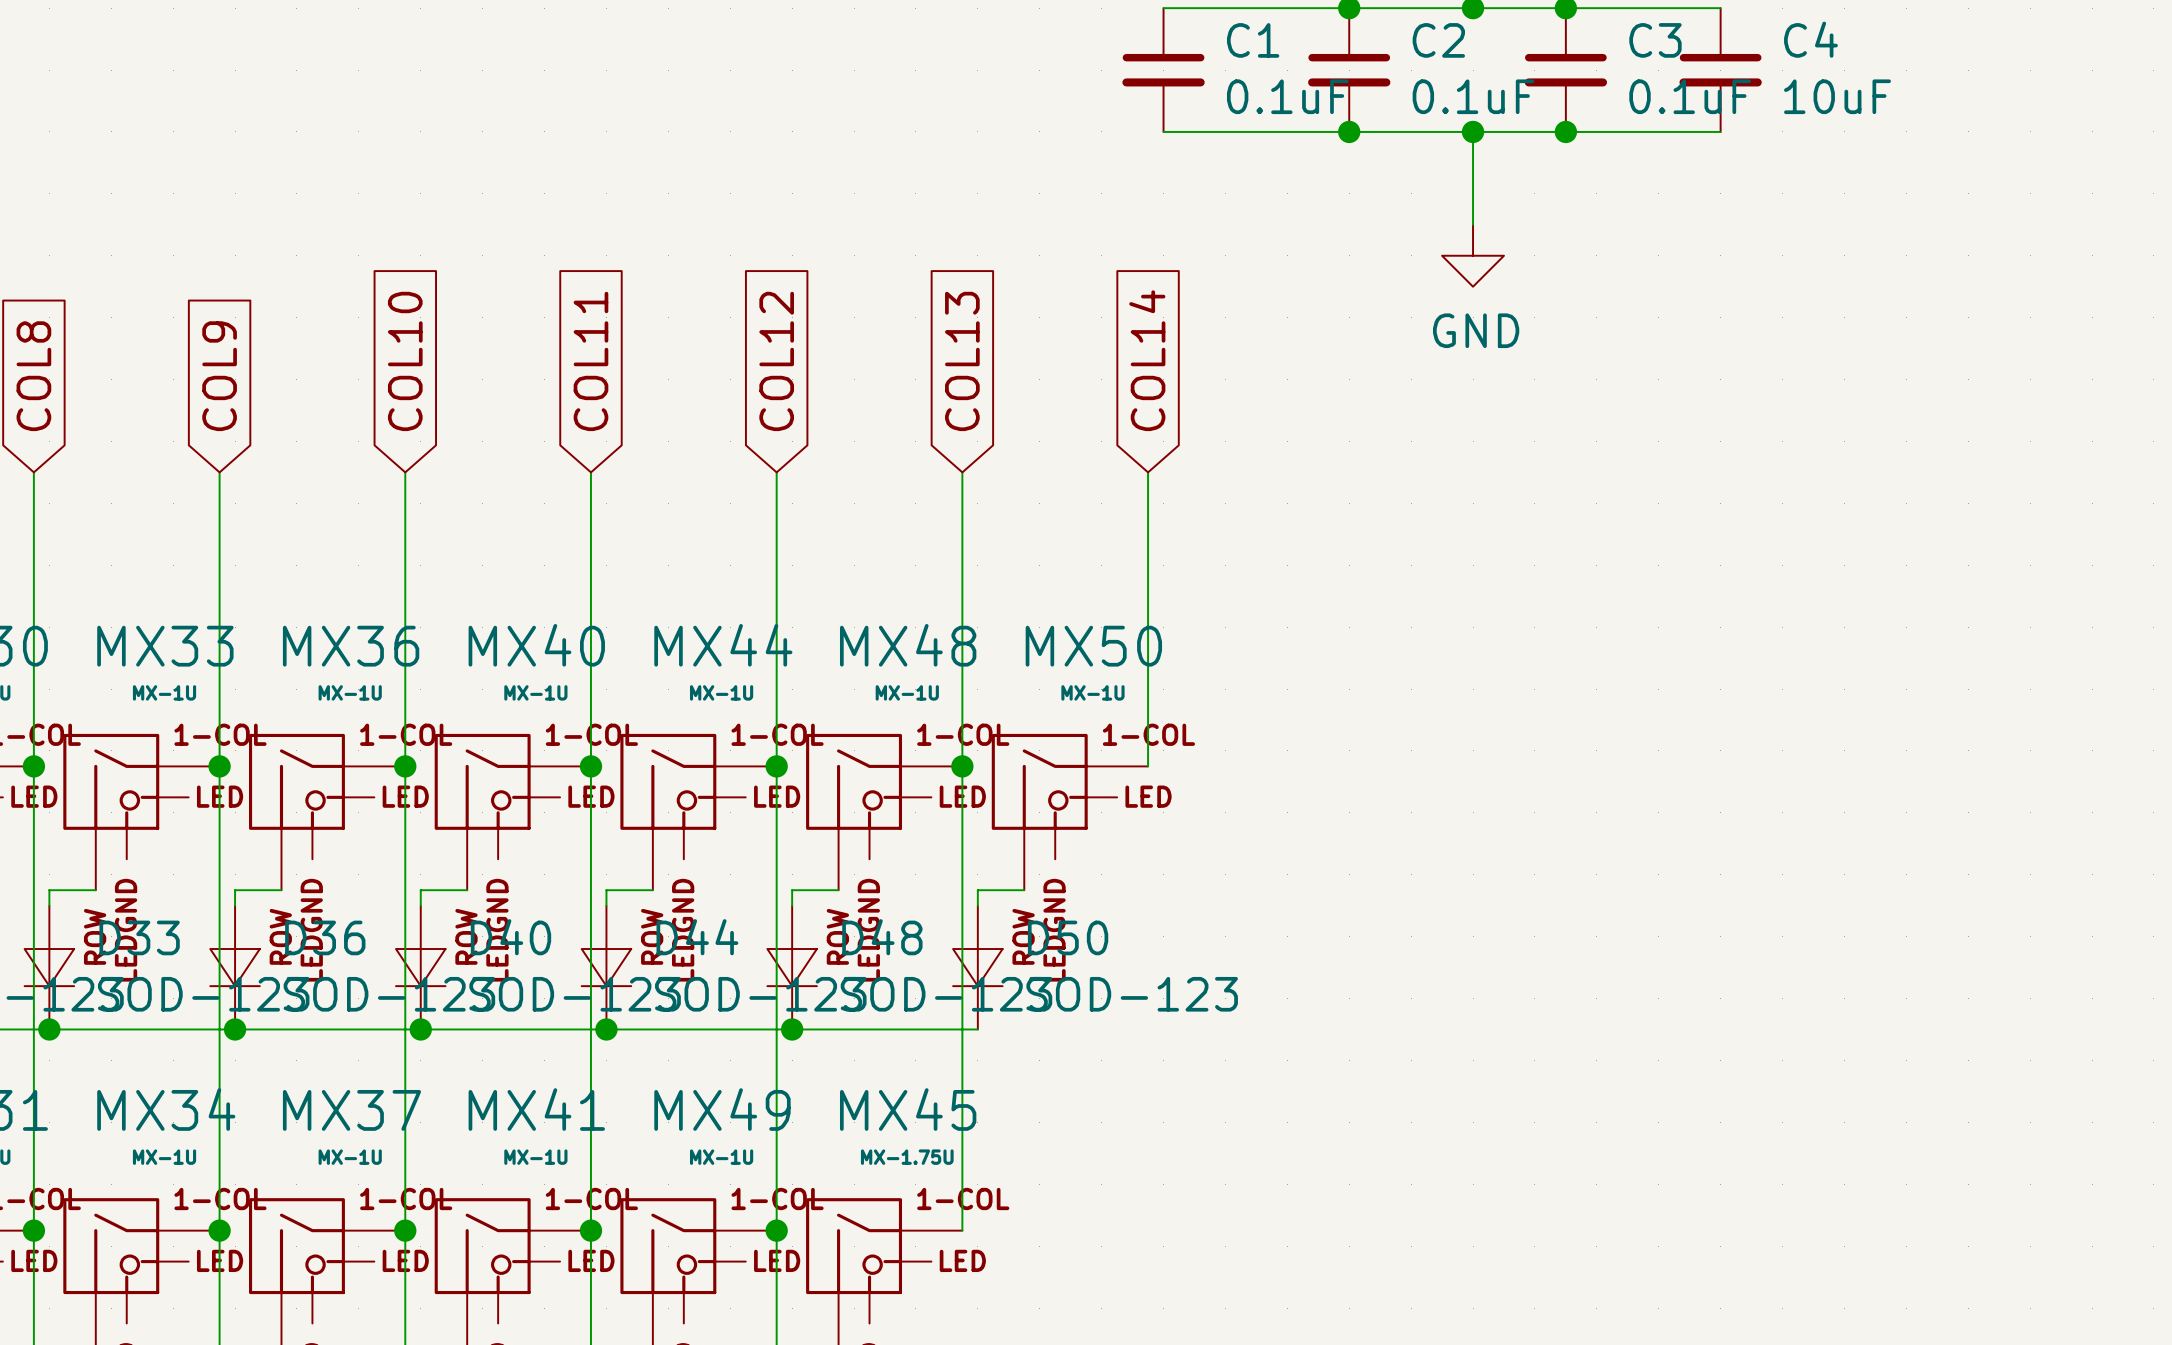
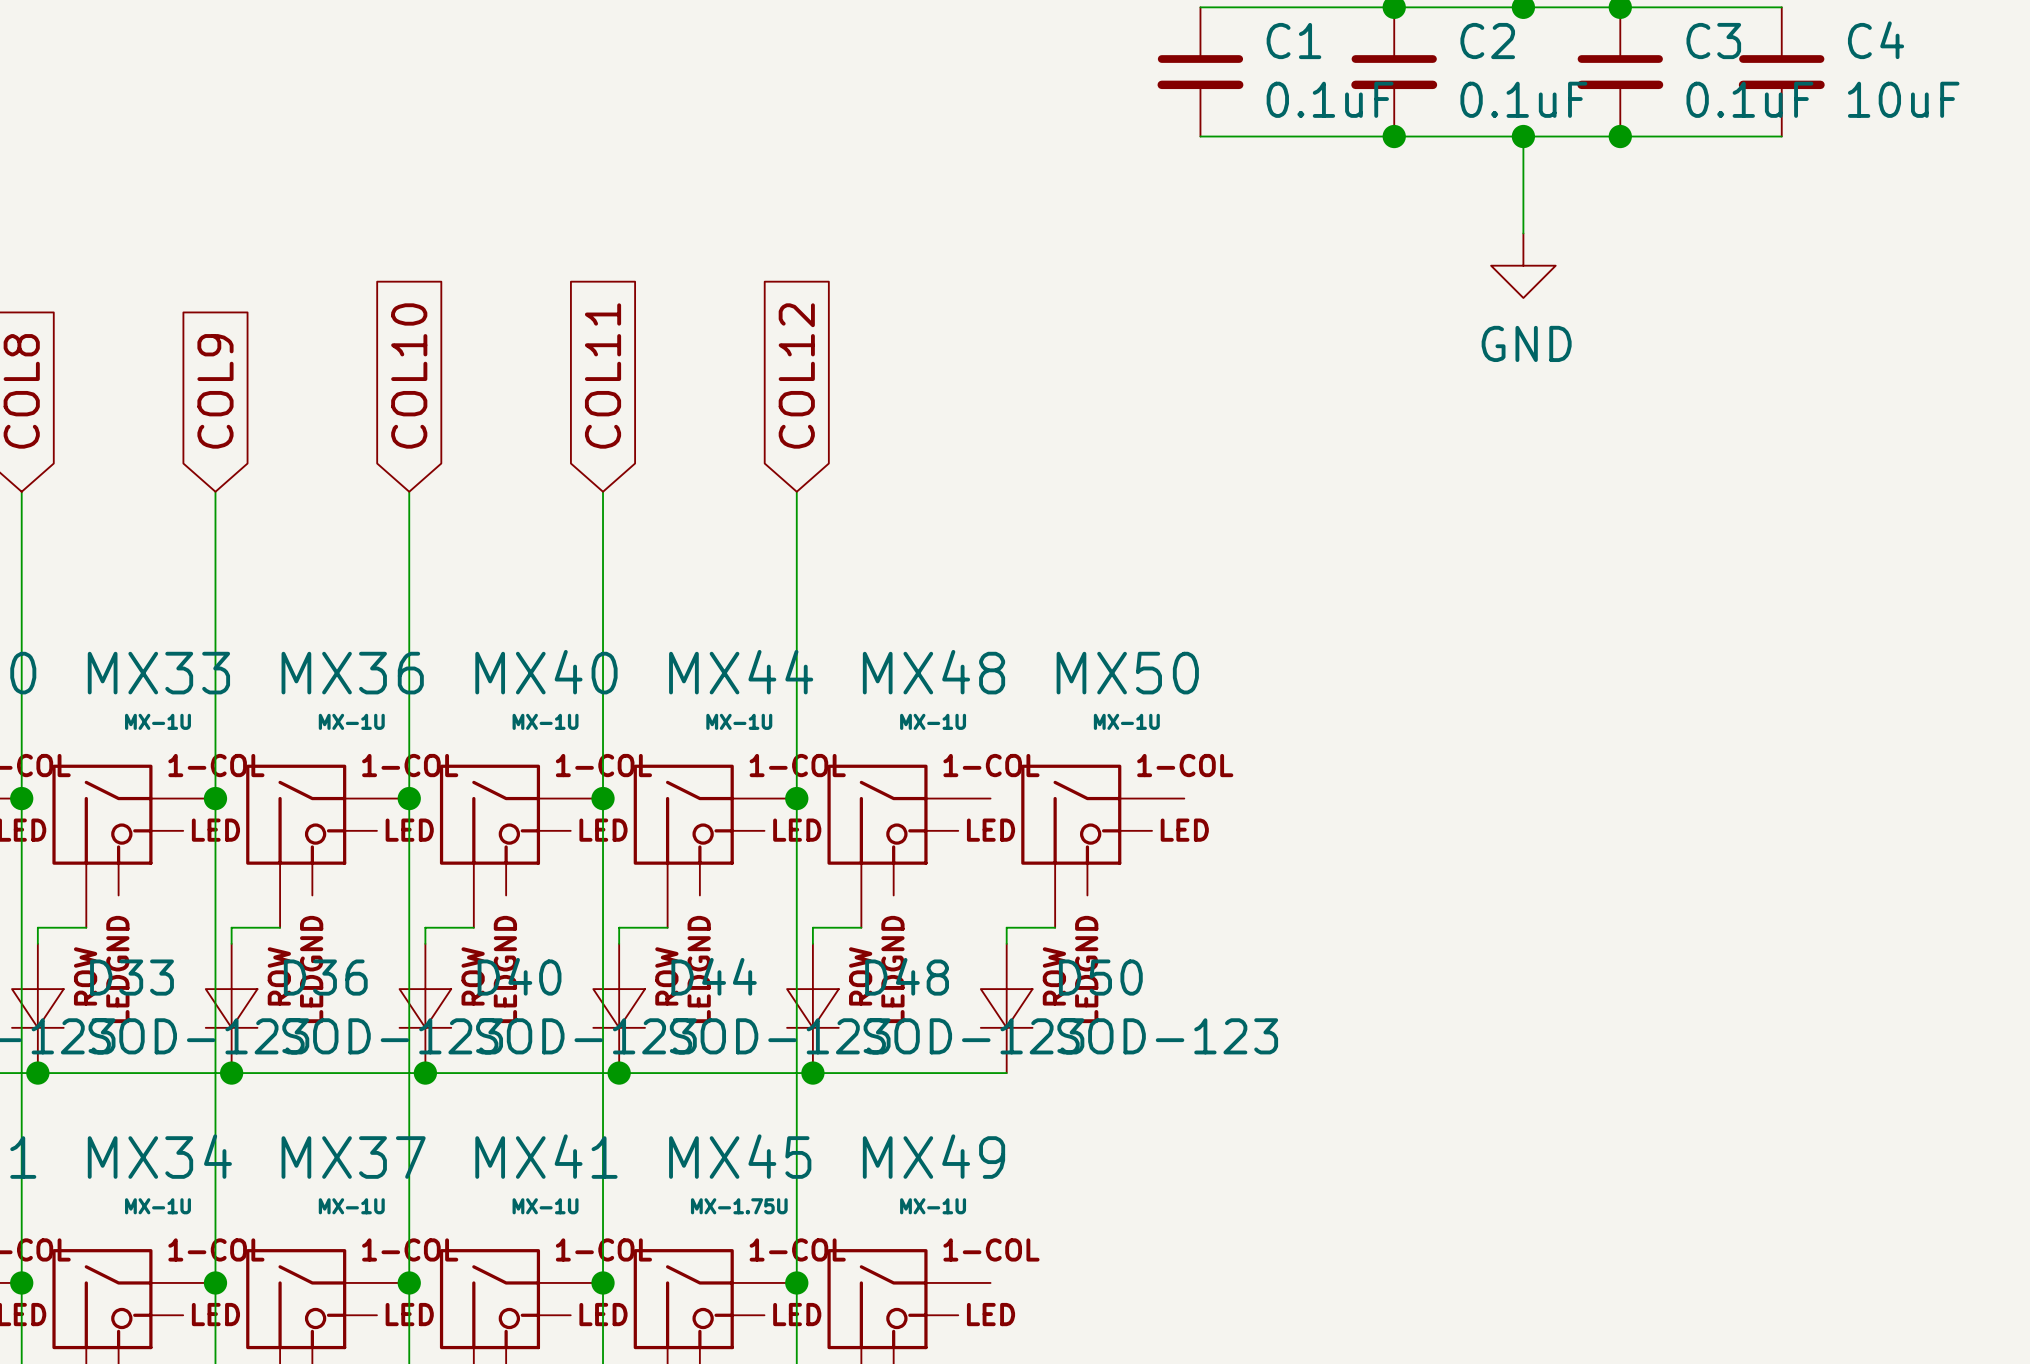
global label: COL14 (1147, 360) -> none
global label: COL13 (962, 361) -> none
wire: (962, 472) (962, 1230) -> none
wire: (1148, 472) (1148, 766) -> none
junction: (962, 766) -> none
MX49 name: MX49 (722, 1109) -> MX45 (740, 1156)
MX45 name: MX45 (908, 1109) -> MX49 (933, 1156)
MX49 value: MX-1U (721, 1157) -> MX-1.75U (739, 1206)
MX45 value: MX-1.75U (907, 1157) -> MX-1U (933, 1206)

